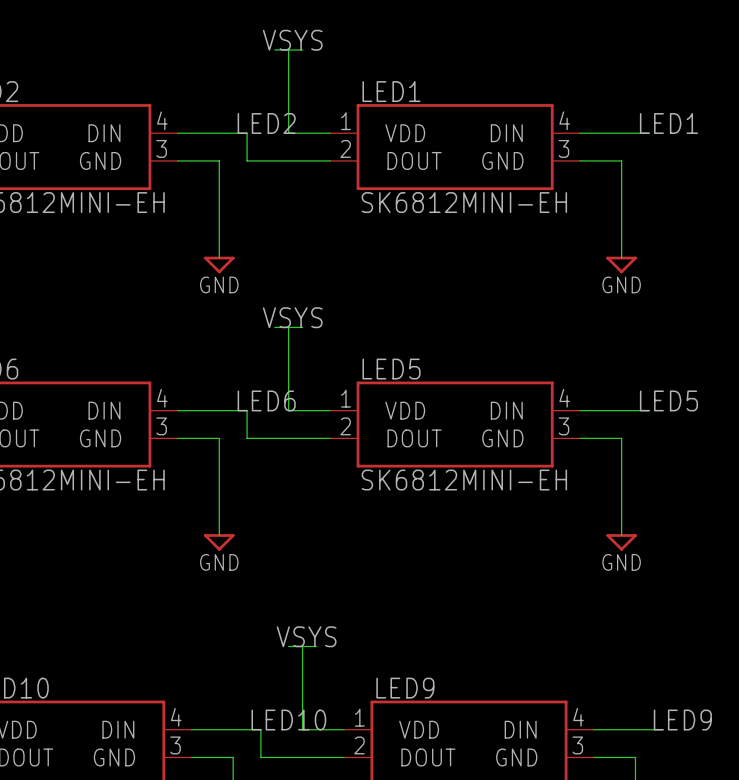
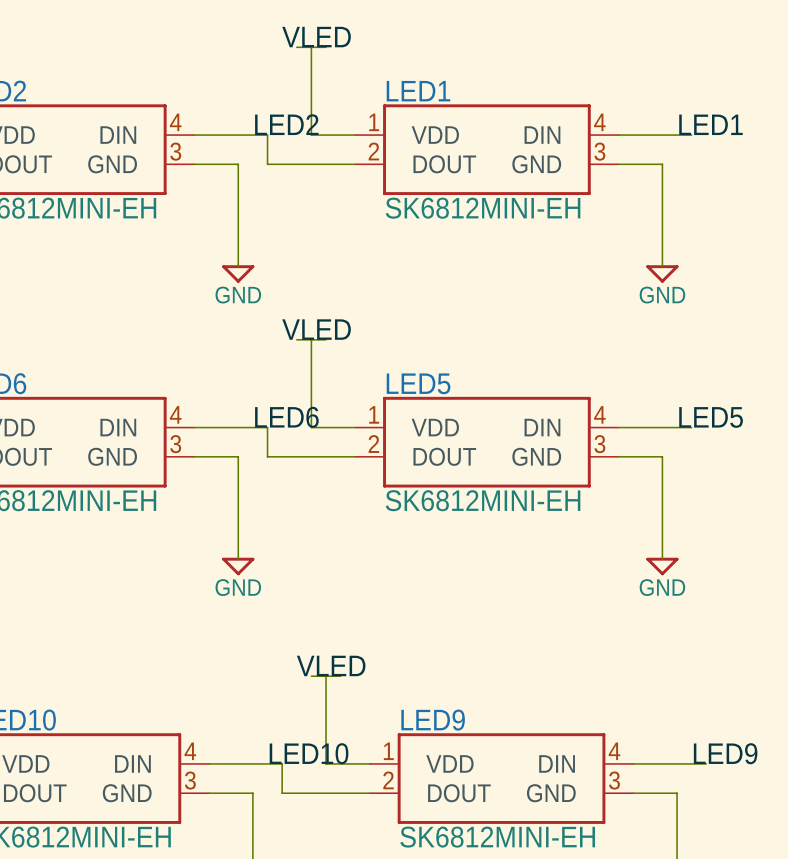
label: VSYS (292, 40) -> VLED (316, 37)
label: VSYS (292, 317) -> VLED (316, 329)
label: VSYS (306, 636) -> VLED (331, 665)

